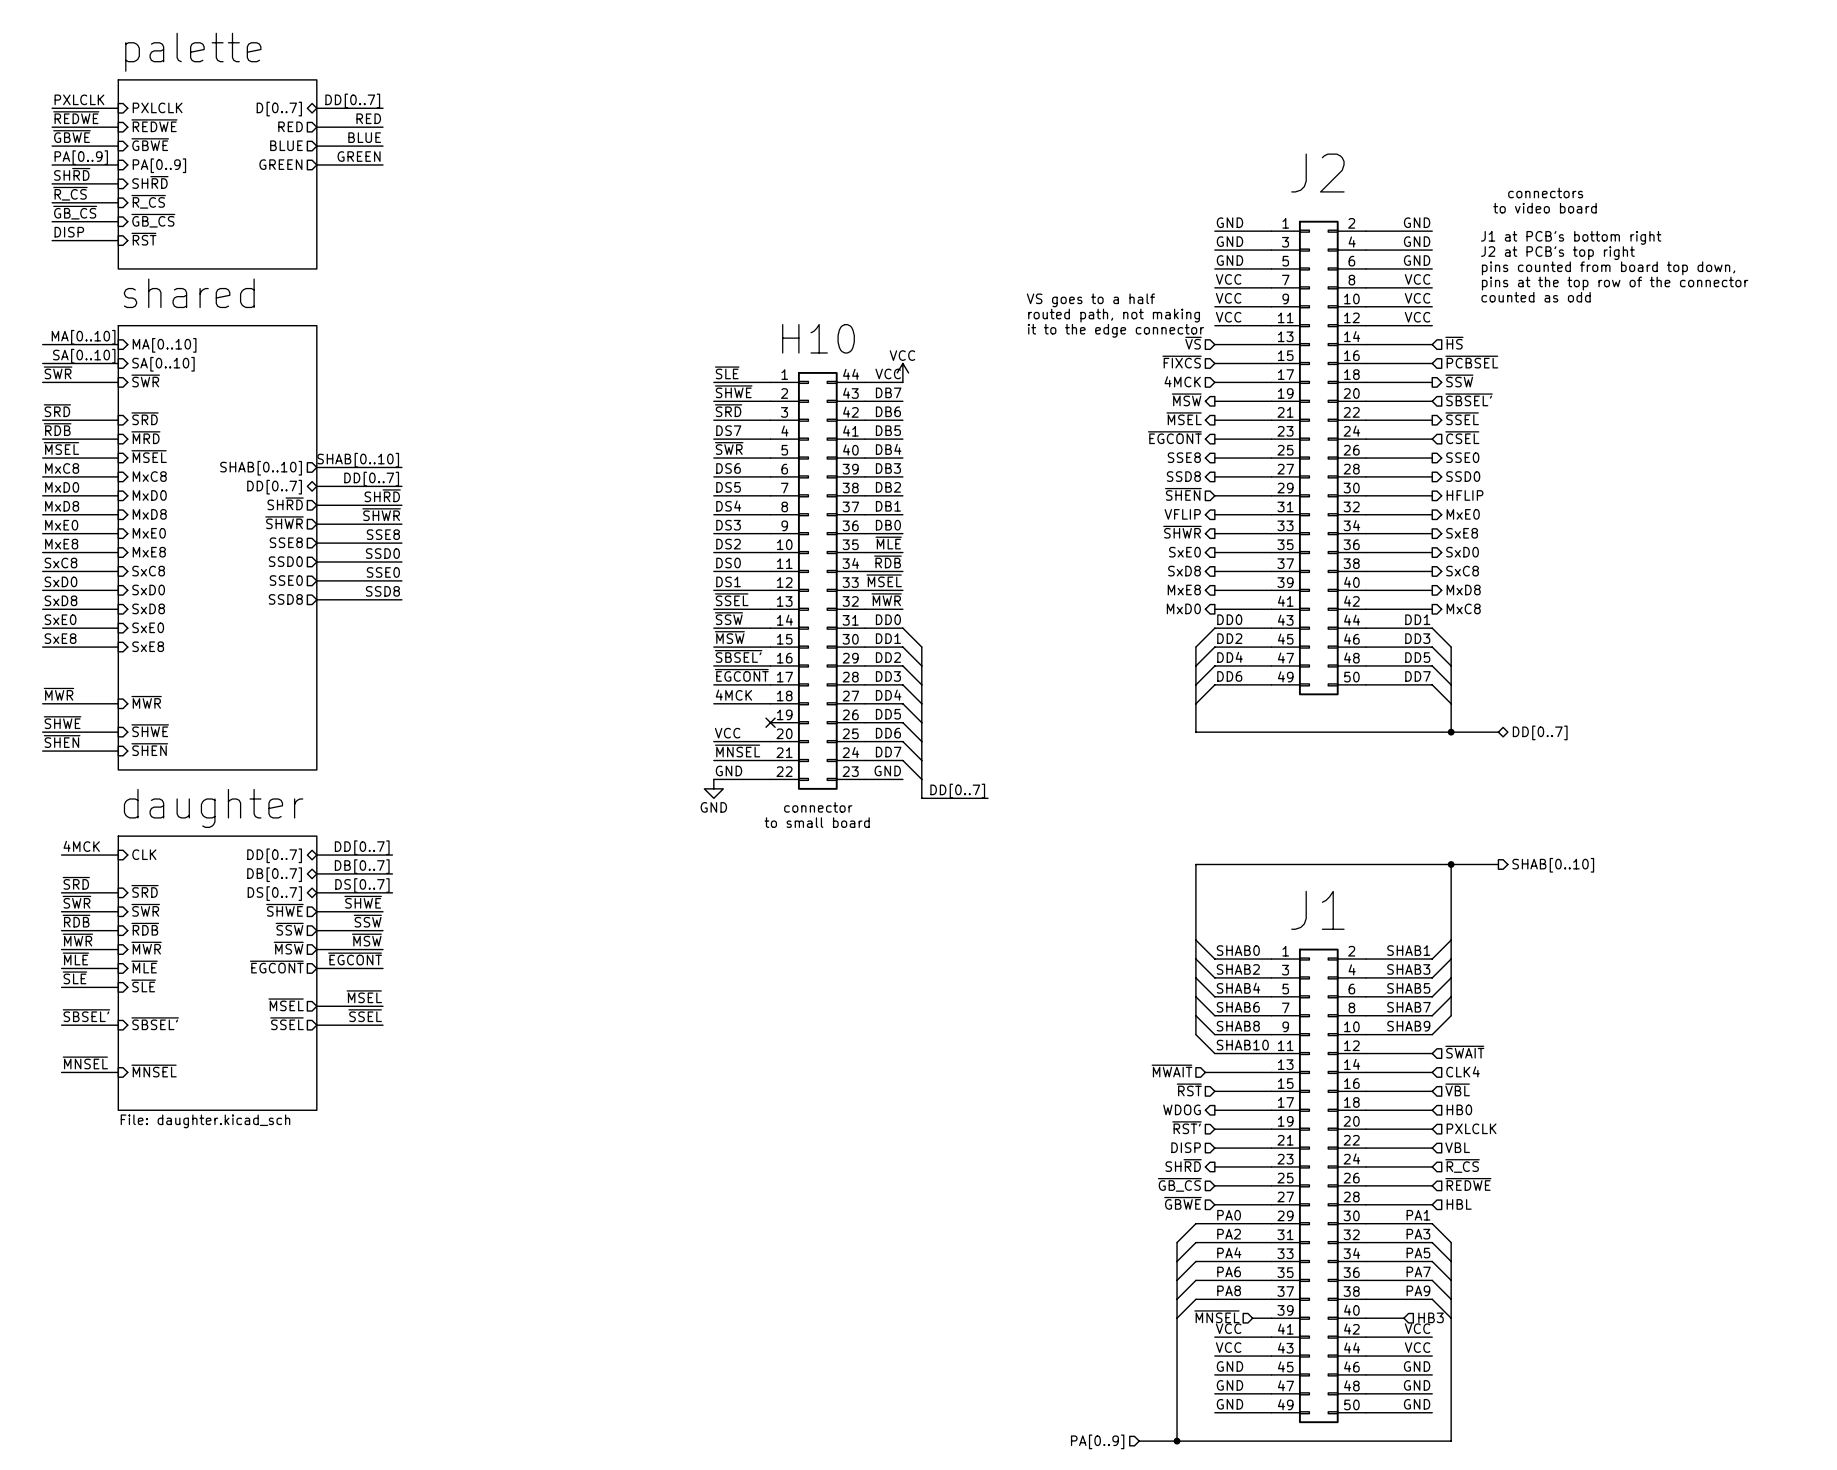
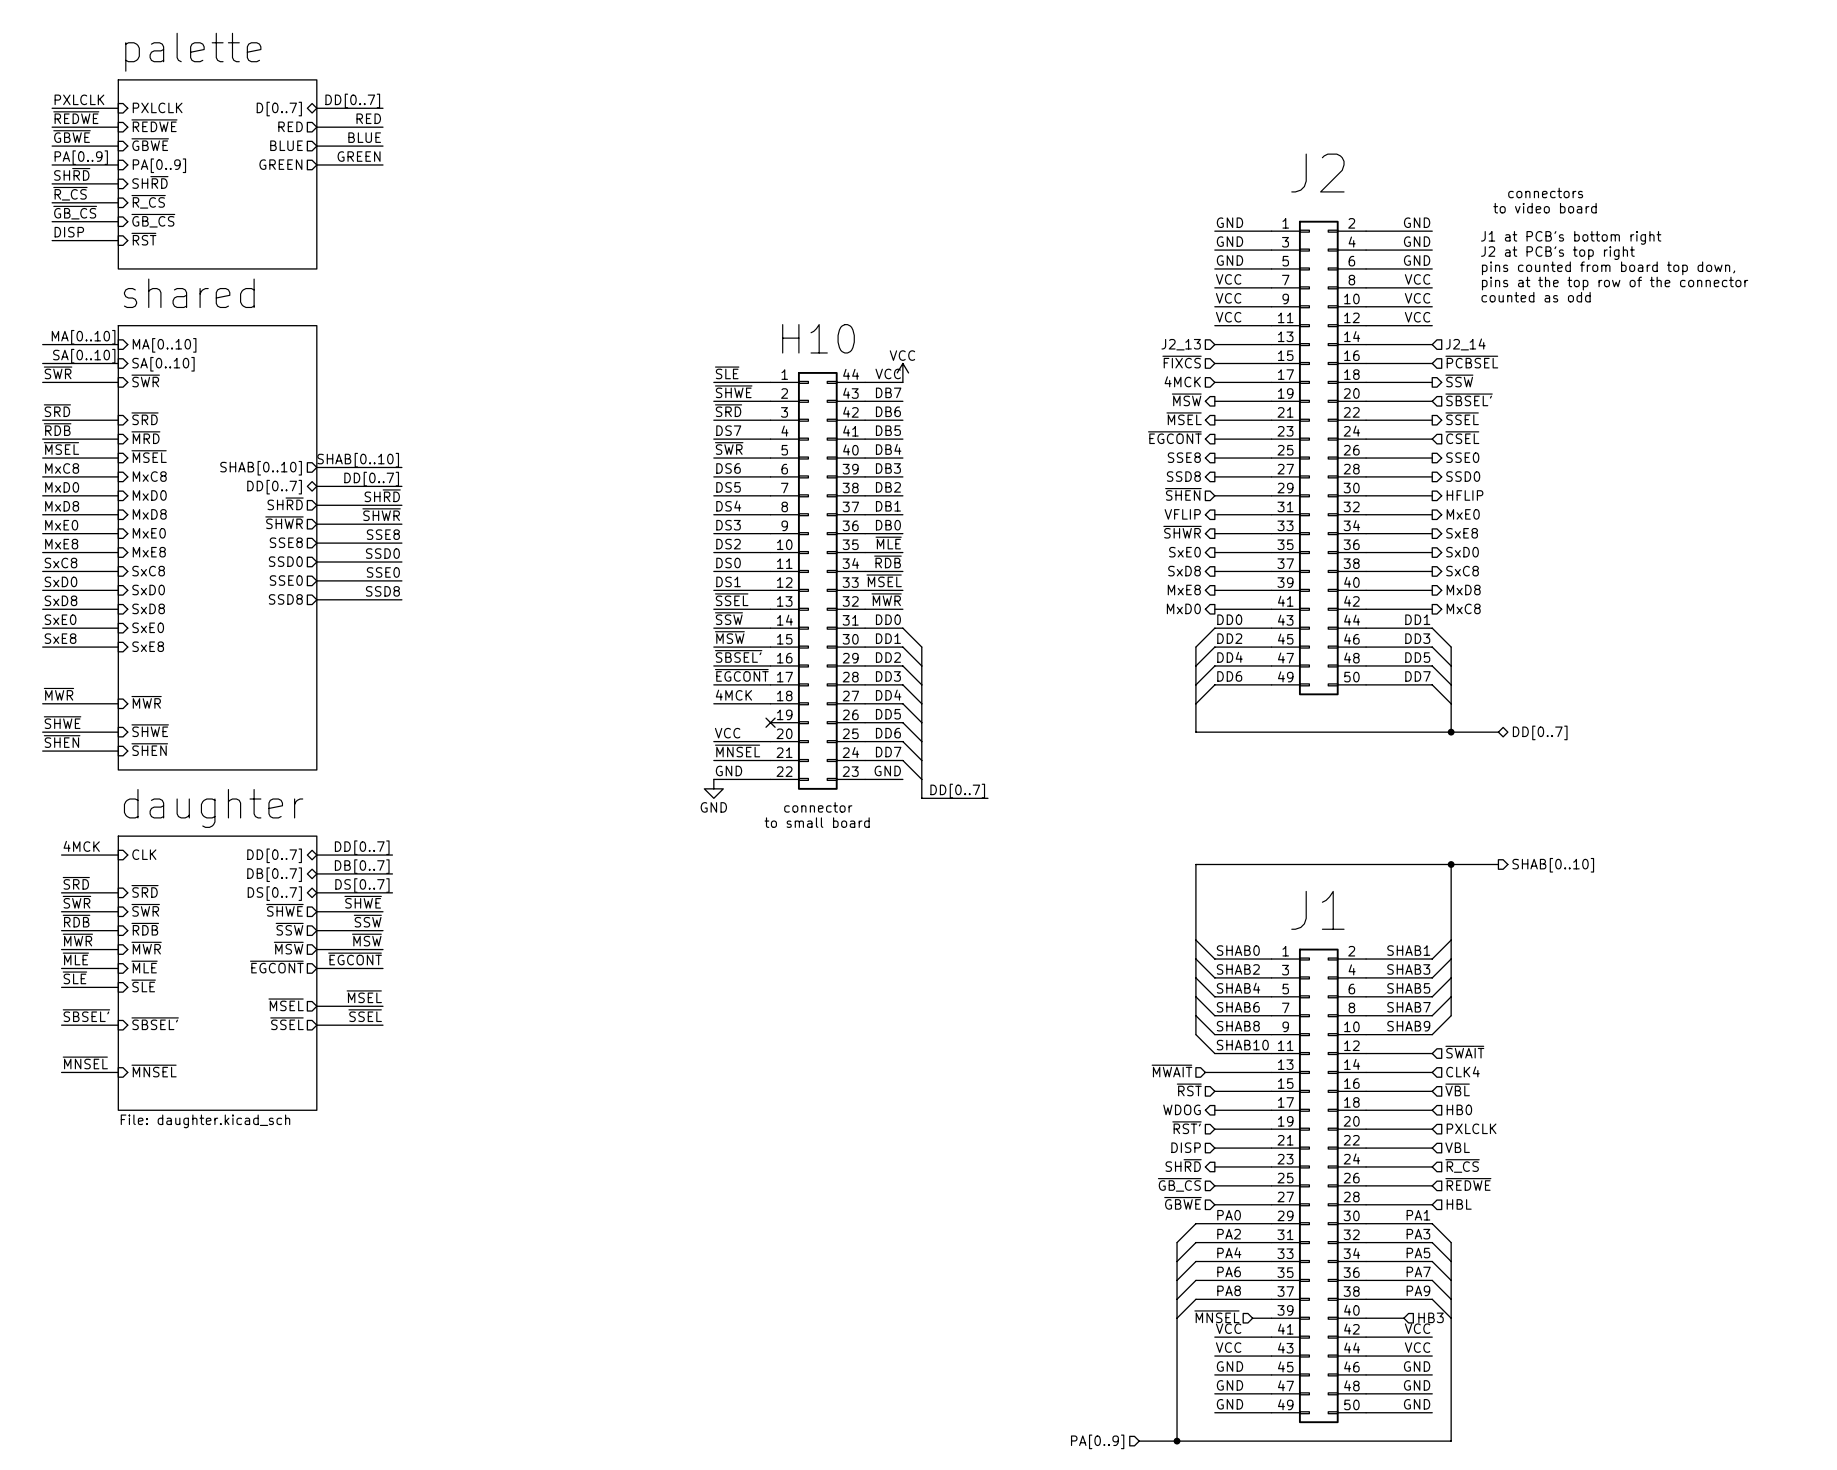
text: VS goes to a half (1090, 300) -> none
text: routed path, not making (1114, 315) -> none
text: it to the edge connector (1115, 330) -> none
hierarchical label: ~{VS} (1193, 343) -> J2_13 (1181, 344)
hierarchical label: ~{HS} (1454, 343) -> J2_14 (1465, 344)

